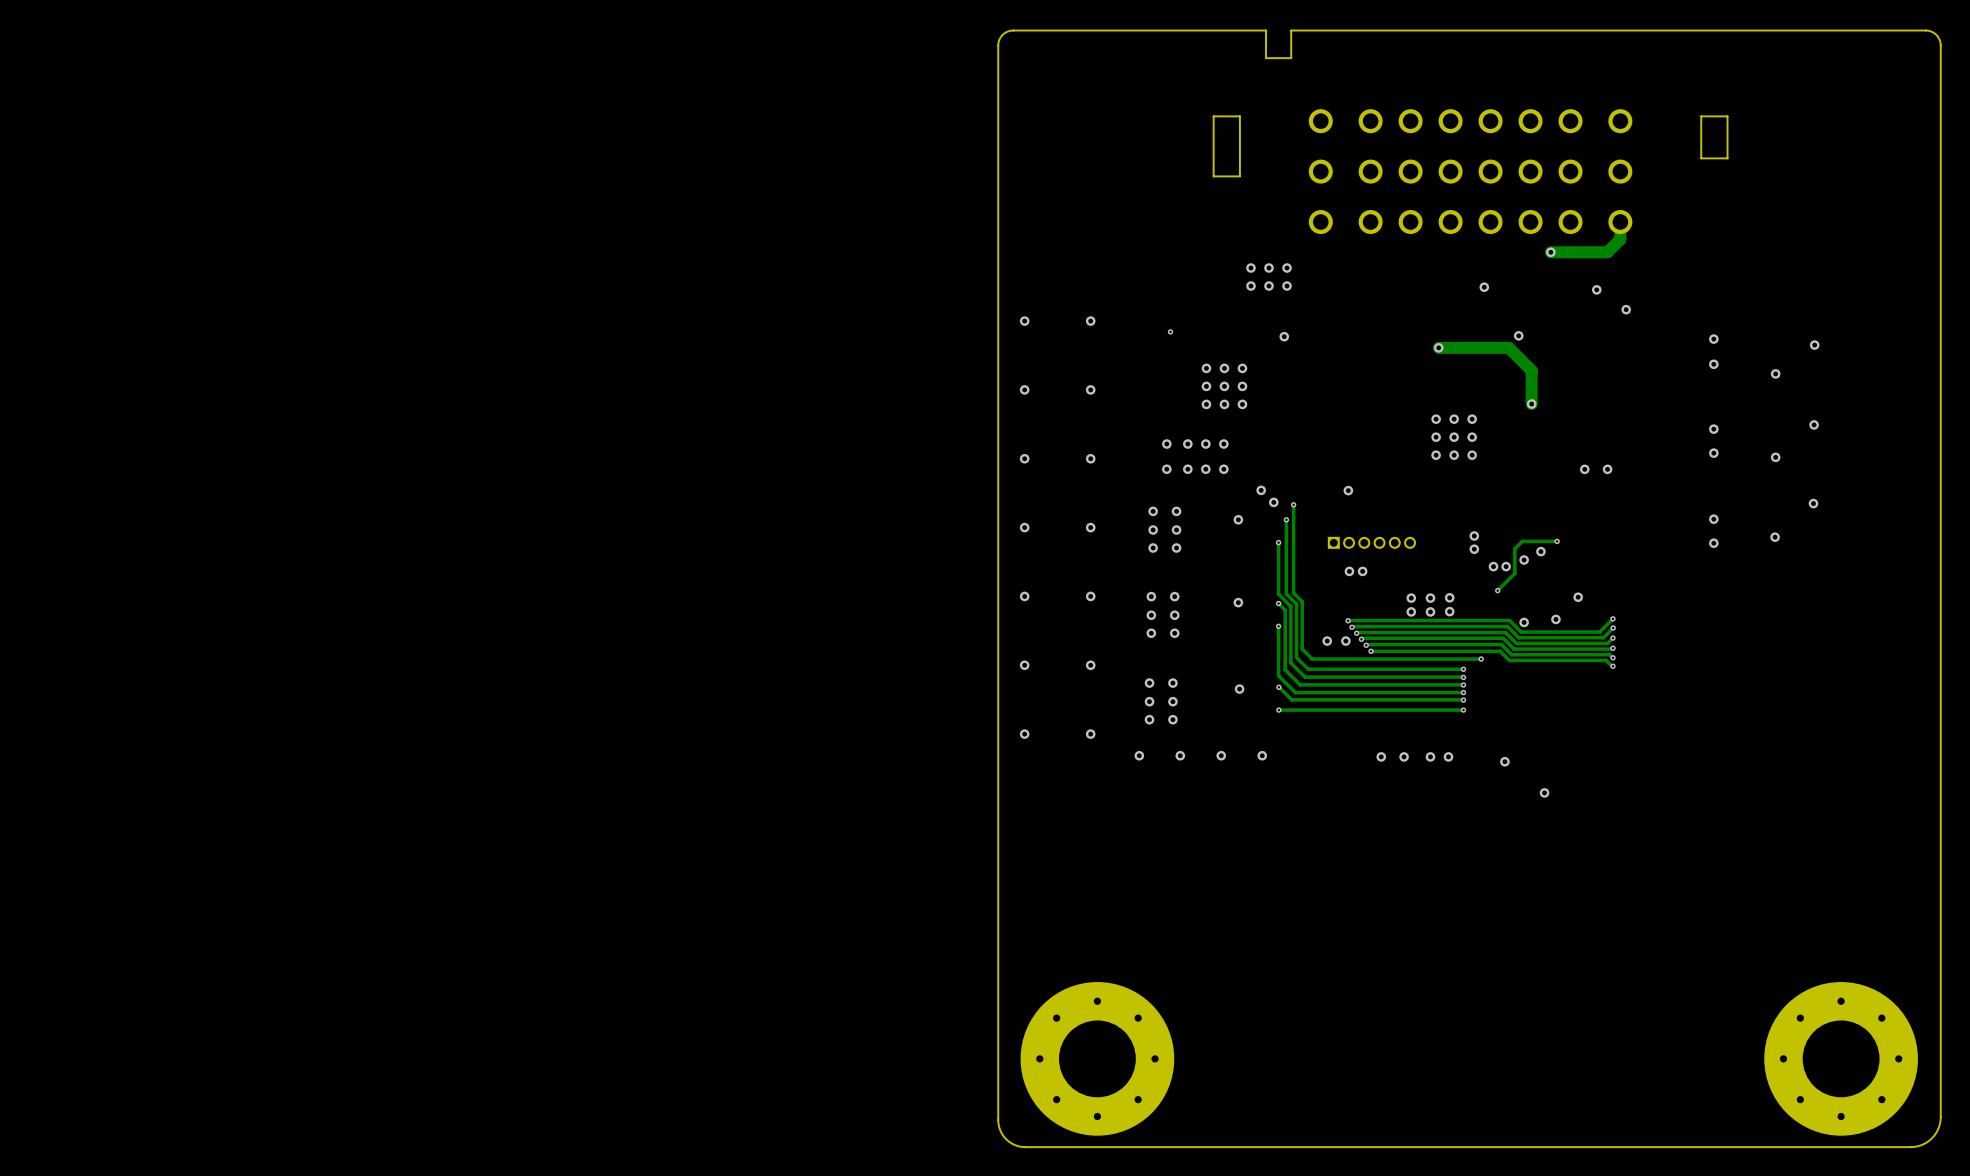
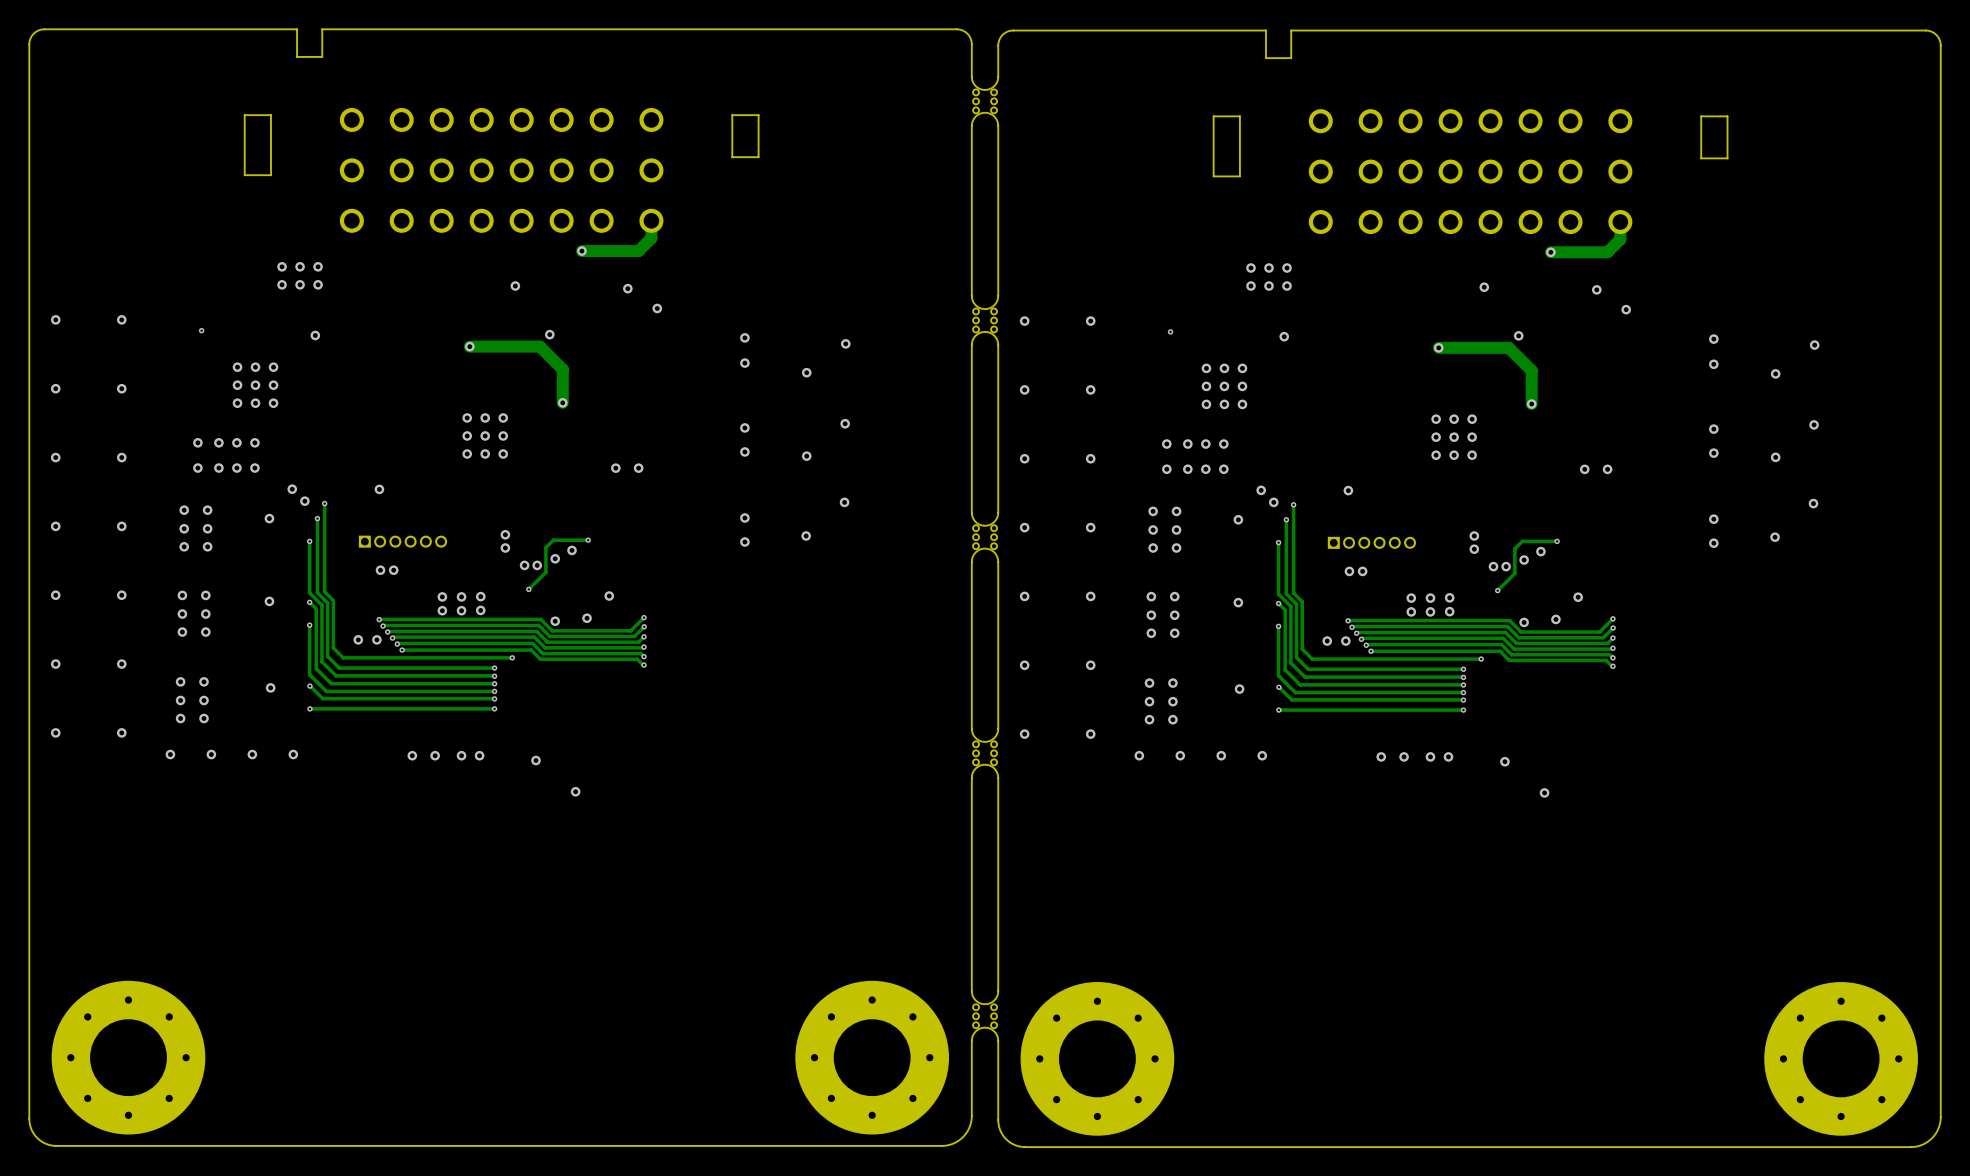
board edge: (998, 76) (998, 125) -> (998, 295) (994, 304) (986, 308) (977, 306) (971, 297) (971, 125) (975, 117) (985, 112) (993, 116) (998, 125)
part: none -> (985, 101)
board edge: none -> (271, 115) (244, 115) (244, 175) (271, 175) (271, 115)
board edge: none -> (758, 115) (732, 115) (732, 157) (758, 157) (758, 115)
part: none -> (501, 170)
track: none -> (651, 220) (651, 238) (638, 251) (581, 251)
via: none -> (581, 251)
via: none -> (282, 266)
via: none -> (300, 266)
via: none -> (318, 266)
via: none -> (282, 284)
via: none -> (300, 284)
via: none -> (318, 284)
via: none -> (515, 286)
via: none -> (627, 288)
board edge: (998, 295) (998, 345) -> (998, 512) (994, 521) (985, 525) (976, 522) (971, 512) (971, 343) (976, 335) (985, 331) (993, 335) (998, 345)
via: none -> (657, 308)
via: none -> (55, 319)
via: none -> (121, 319)
part: none -> (985, 320)
via: none -> (201, 330)
via: none -> (549, 334)
via: none -> (315, 335)
via: none -> (744, 337)
via: none -> (845, 343)
track: none -> (469, 346) (539, 346) (562, 369) (562, 402)
via: none -> (469, 346)
via: none -> (744, 363)
via: none -> (237, 367)
via: none -> (255, 367)
via: none -> (273, 367)
via: none -> (806, 372)
via: none -> (237, 385)
via: none -> (255, 385)
via: none -> (273, 385)
via: none -> (55, 388)
via: none -> (121, 388)
via: none -> (562, 402)
via: none -> (237, 403)
via: none -> (255, 403)
via: none -> (273, 403)
via: none -> (467, 417)
via: none -> (485, 417)
via: none -> (503, 417)
via: none -> (845, 423)
via: none -> (744, 427)
via: none -> (467, 435)
via: none -> (485, 435)
via: none -> (503, 435)
via: none -> (197, 442)
via: none -> (218, 442)
via: none -> (236, 442)
via: none -> (254, 442)
via: none -> (744, 451)
via: none -> (467, 453)
via: none -> (485, 453)
via: none -> (503, 453)
via: none -> (806, 456)
via: none -> (55, 457)
via: none -> (121, 457)
via: none -> (197, 468)
via: none -> (218, 468)
via: none -> (236, 468)
via: none -> (254, 468)
via: none -> (615, 468)
via: none -> (638, 468)
via: none -> (292, 489)
via: none -> (379, 489)
via: none -> (304, 501)
via: none -> (844, 502)
track: none -> (324, 503) (324, 591) (333, 600) (333, 647) (343, 657) (512, 657)
via: none -> (324, 503)
via: none -> (184, 510)
via: none -> (207, 510)
board edge: (998, 512) (998, 561) -> (998, 728) (994, 737) (986, 741) (977, 739) (971, 730) (971, 561) (975, 553) (985, 548) (993, 551) (998, 561)
via: none -> (744, 517)
via: none -> (269, 518)
track: none -> (317, 518) (317, 592) (327, 602) (327, 656) (339, 668) (494, 668)
via: none -> (317, 518)
via: none -> (55, 526)
via: none -> (121, 526)
via: none -> (184, 528)
via: none -> (207, 528)
via: none -> (505, 534)
via: none -> (806, 535)
part: none -> (985, 537)
track: none -> (588, 540) (553, 540) (545, 547) (545, 572) (528, 589)
via: none -> (588, 540)
track: none -> (309, 541) (309, 592) (321, 605) (321, 661) (336, 675) (494, 676)
via: none -> (309, 541)
part: none -> (403, 541)
via: none -> (744, 541)
via: none -> (184, 546)
via: none -> (207, 546)
via: none -> (505, 548)
via: none -> (572, 550)
via: none -> (555, 558)
via: none -> (524, 565)
via: none -> (537, 565)
via: none -> (380, 570)
via: none -> (393, 570)
via: none -> (528, 589)
via: none -> (55, 595)
via: none -> (121, 595)
via: none -> (182, 595)
via: none -> (205, 595)
via: none -> (442, 596)
via: none -> (461, 596)
via: none -> (480, 596)
via: none -> (609, 596)
via: none -> (269, 601)
track: none -> (309, 602) (316, 608) (316, 668) (331, 683) (494, 683)
via: none -> (309, 602)
via: none -> (442, 610)
via: none -> (461, 610)
via: none -> (480, 610)
via: none -> (182, 614)
via: none -> (205, 614)
track: none -> (644, 617) (630, 630) (552, 630) (540, 619) (379, 619)
via: none -> (644, 617)
via: none -> (587, 618)
via: none -> (379, 619)
via: none -> (555, 621)
track: none -> (309, 625) (309, 674) (326, 691) (494, 691)
via: none -> (309, 625)
track: none -> (383, 626) (538, 625) (549, 636) (634, 636) (644, 626)
via: none -> (383, 626)
via: none -> (644, 626)
via: none -> (182, 632)
via: none -> (205, 632)
track: none -> (387, 632) (536, 631) (547, 642) (638, 642) (644, 636)
via: none -> (387, 632)
via: none -> (644, 636)
track: none -> (392, 638) (534, 637) (545, 647) (644, 647)
via: none -> (392, 638)
via: none -> (358, 639)
via: none -> (376, 639)
track: none -> (397, 644) (532, 643) (542, 653) (640, 653) (644, 656)
via: none -> (397, 644)
via: none -> (644, 647)
track: none -> (402, 650) (531, 650) (540, 659) (637, 659) (644, 665)
via: none -> (402, 650)
via: none -> (644, 656)
via: none -> (512, 657)
via: none -> (55, 664)
via: none -> (121, 664)
via: none -> (644, 665)
via: none -> (494, 668)
via: none -> (494, 676)
via: none -> (180, 681)
via: none -> (204, 681)
via: none -> (494, 683)
track: none -> (309, 686) (322, 698) (494, 698)
via: none -> (309, 686)
via: none -> (270, 687)
via: none -> (494, 691)
via: none -> (494, 698)
via: none -> (180, 700)
via: none -> (204, 700)
via: none -> (309, 708)
track: none -> (494, 708) (309, 708)
via: none -> (494, 708)
via: none -> (180, 718)
via: none -> (204, 718)
board edge: (998, 728) (998, 777) -> (998, 991) (994, 1000) (985, 1004) (975, 1000) (971, 992) (971, 777) (975, 769) (985, 764) (993, 768) (998, 777)
via: none -> (55, 732)
via: none -> (121, 732)
part: none -> (985, 753)
via: none -> (170, 754)
via: none -> (211, 754)
via: none -> (252, 754)
via: none -> (293, 754)
via: none -> (412, 755)
via: none -> (435, 755)
via: none -> (461, 755)
via: none -> (479, 755)
via: none -> (535, 760)
via: none -> (575, 791)
board edge: (998, 991) (998, 1040) -> (998, 76) (995, 84) (989, 89) (981, 89) (975, 85) (971, 78) (971, 40) (965, 32) (956, 29) (322, 29) (322, 56) (297, 56) (297, 29) (44, 29) (33, 33) (29, 44) (29, 1122) (32, 1132) (39, 1140) (56, 1145) (945, 1145) (954, 1142) (963, 1137) (971, 1122) (971, 1040) (973, 1034) (979, 1028) (988, 1028) (995, 1032) (998, 1040)
part: none -> (985, 1016)
part: none -> (128, 1057)
part: none -> (872, 1057)

